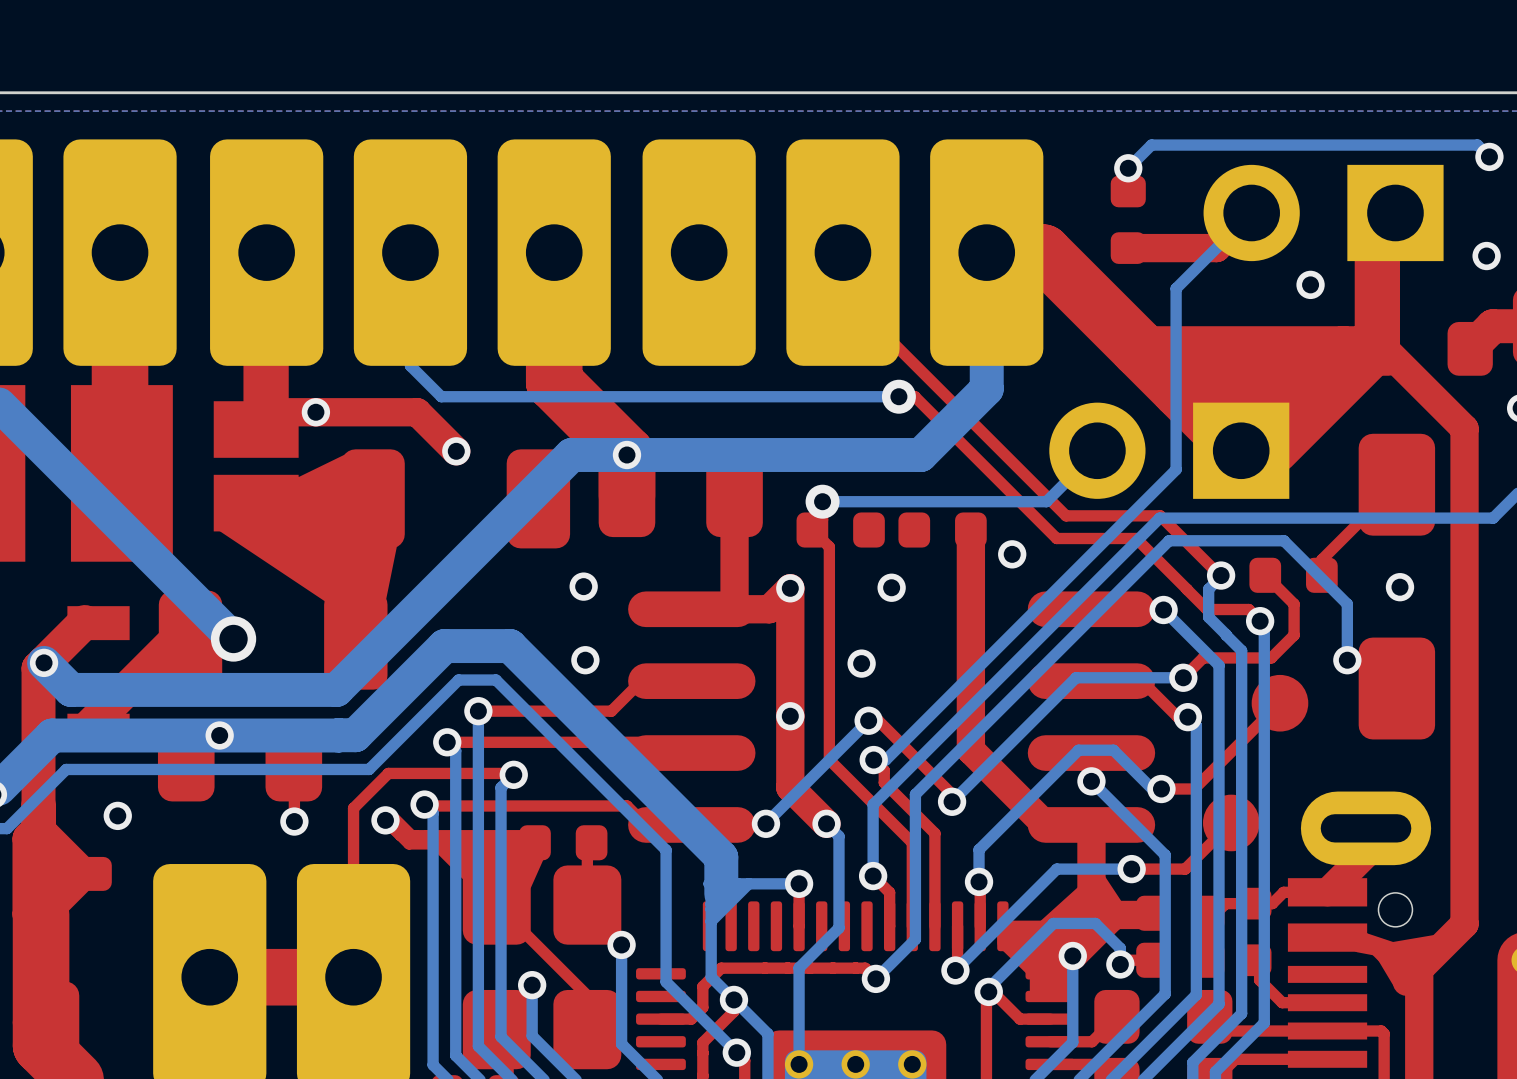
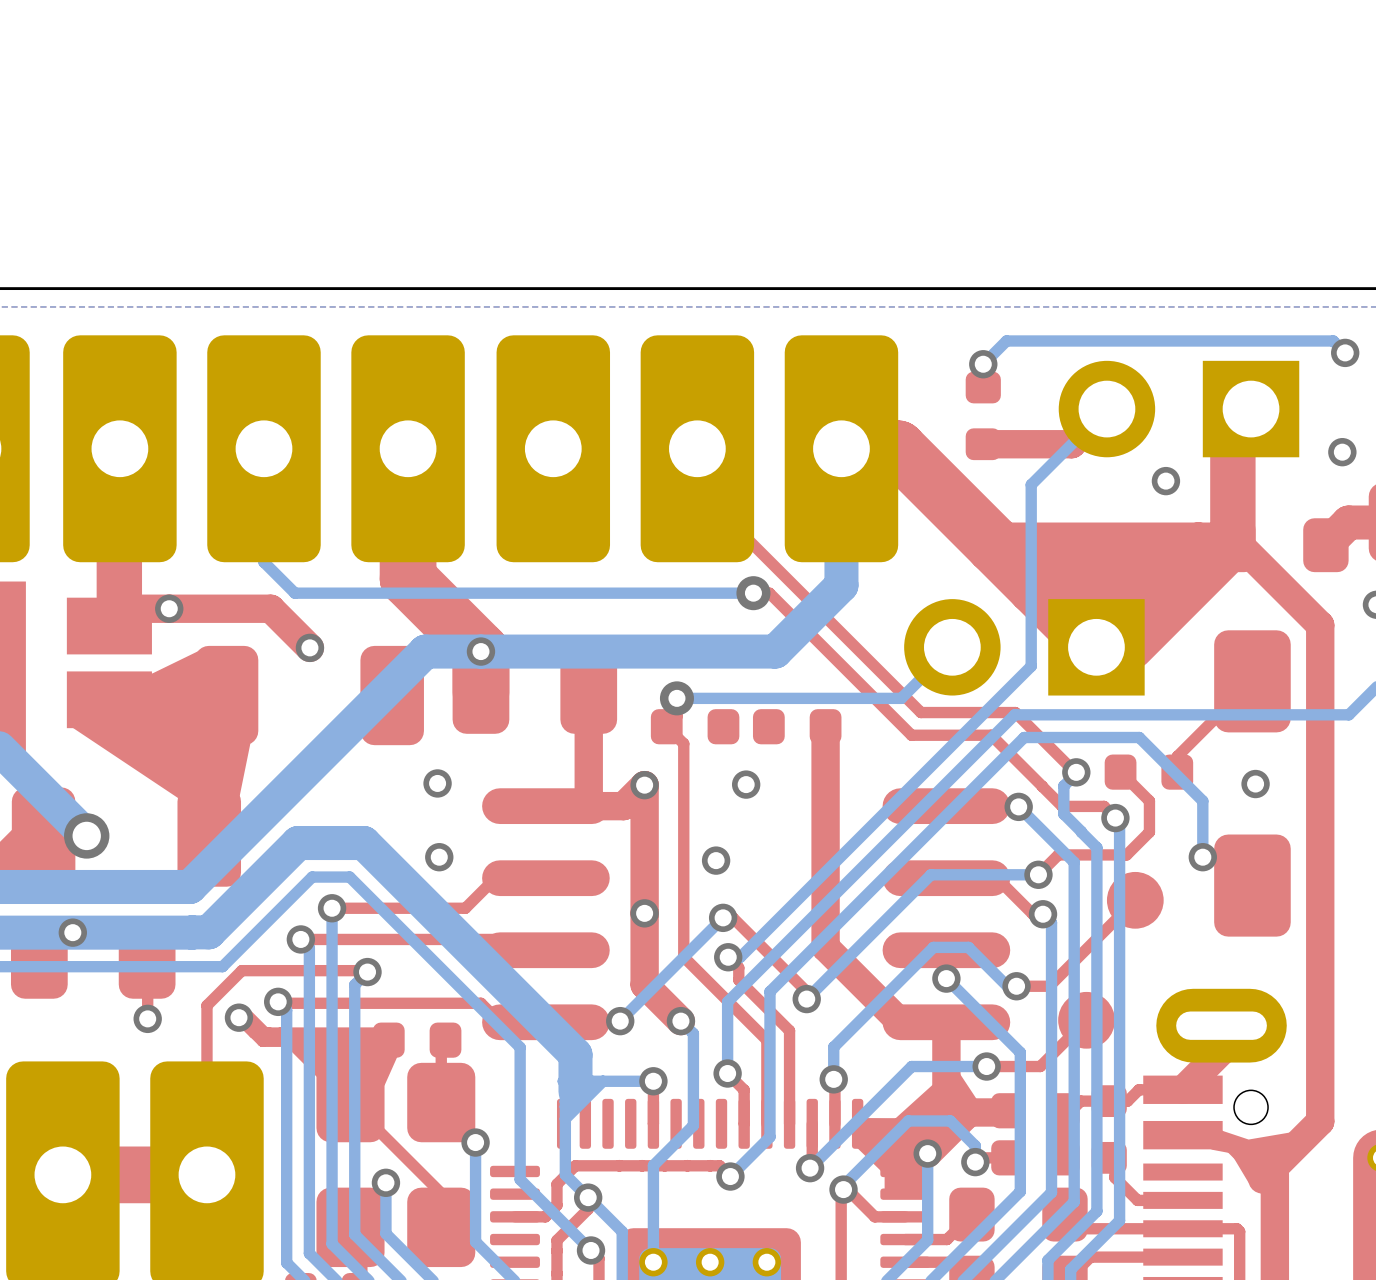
via: (1012, 554) -> none

